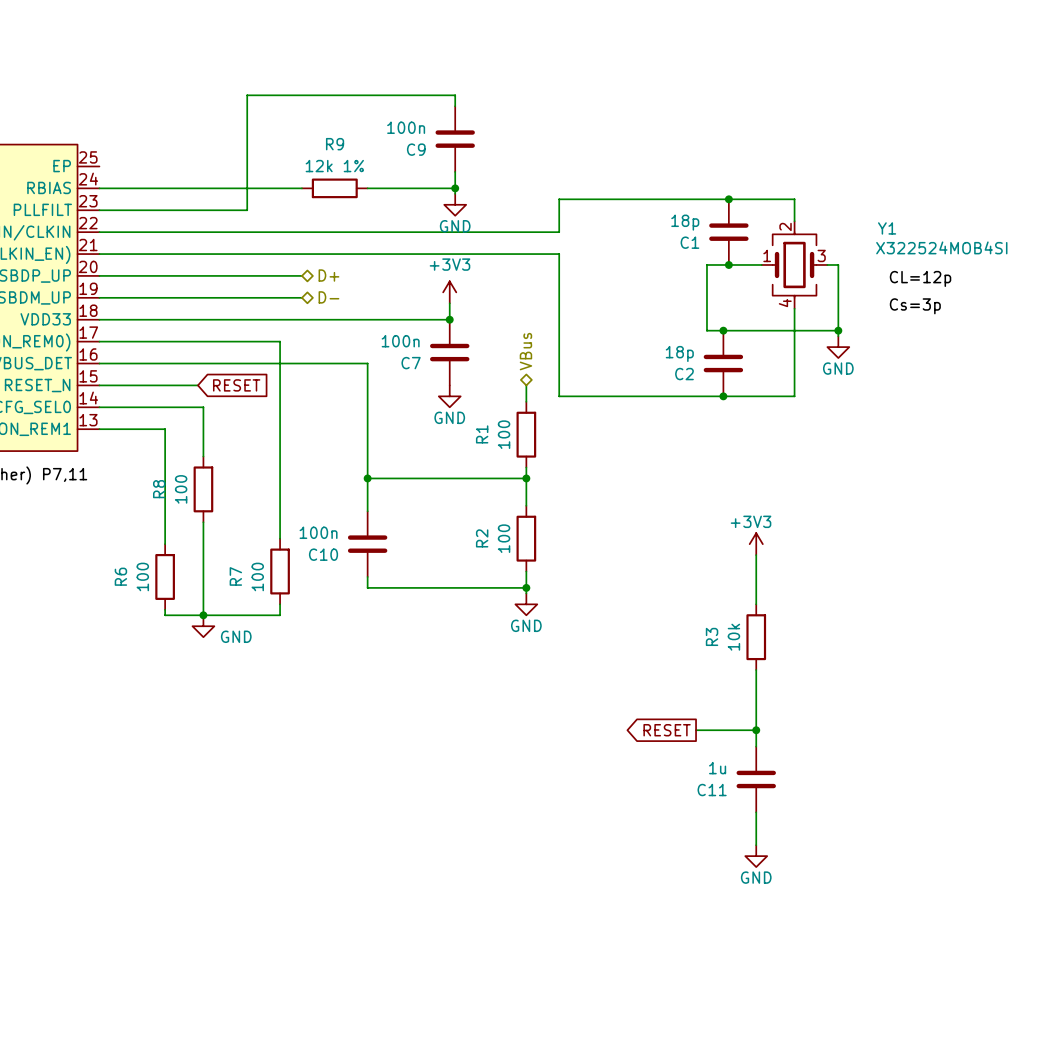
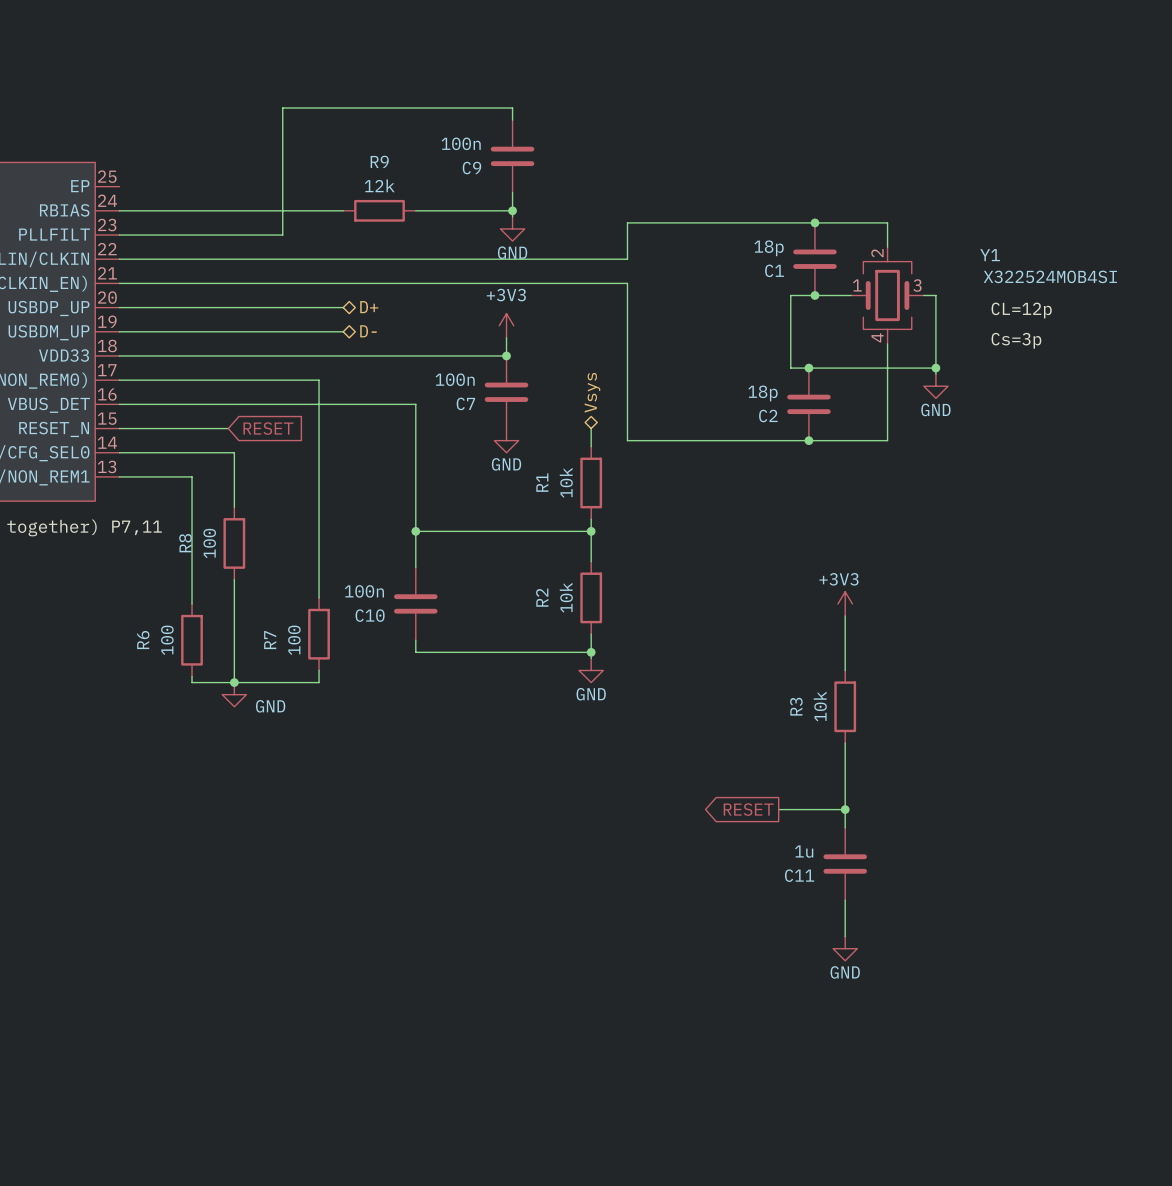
R9 value: 12k 1% (334, 166) -> 12k (379, 185)
hierarchical label: VBus (525, 351) -> Vsys (592, 392)
R1 value: 100 (504, 434) -> 10k (566, 482)
R2 value: 100 (504, 538) -> 10k (566, 597)

